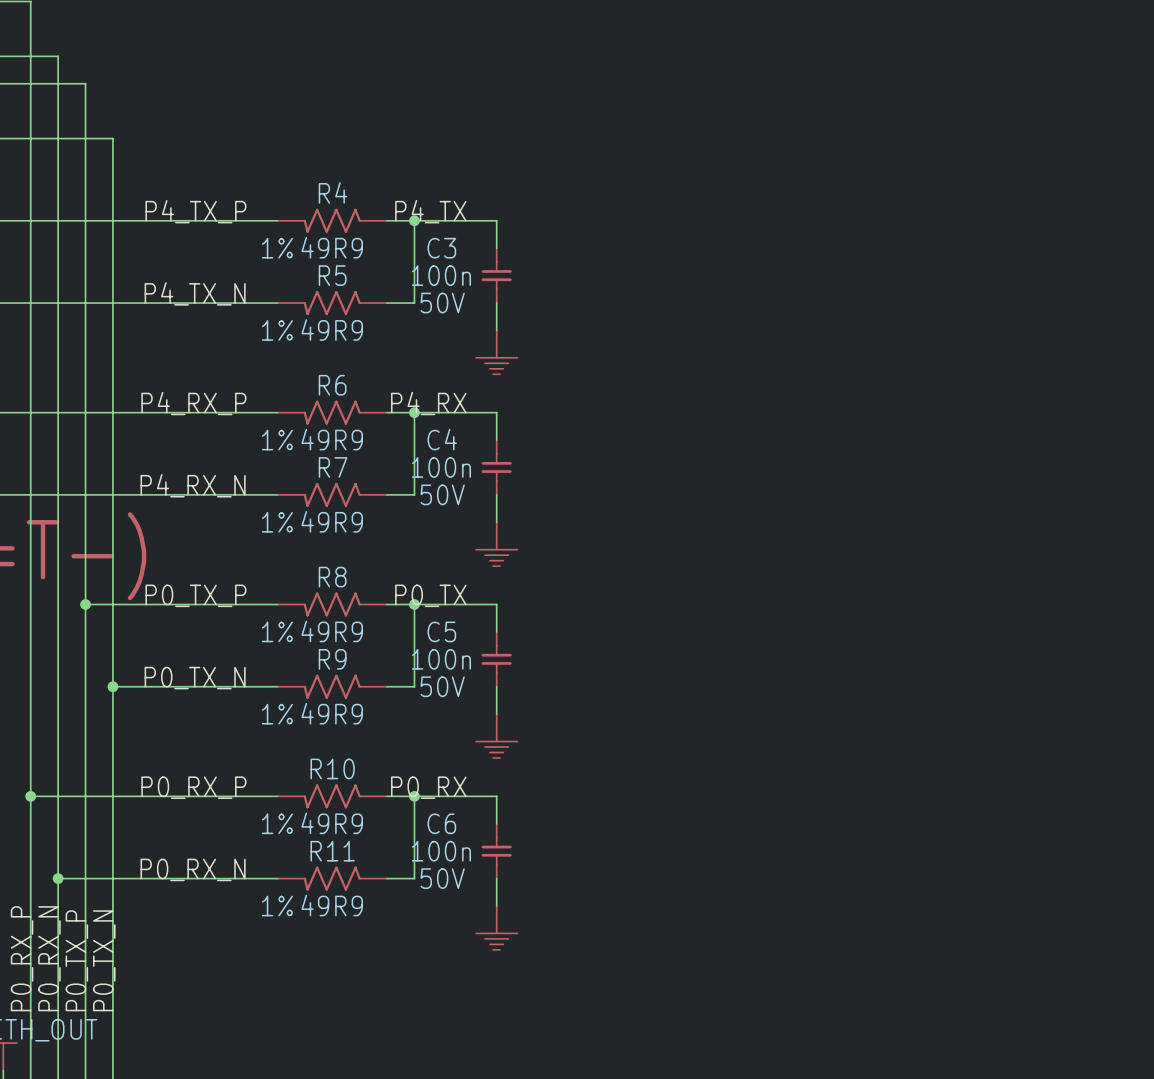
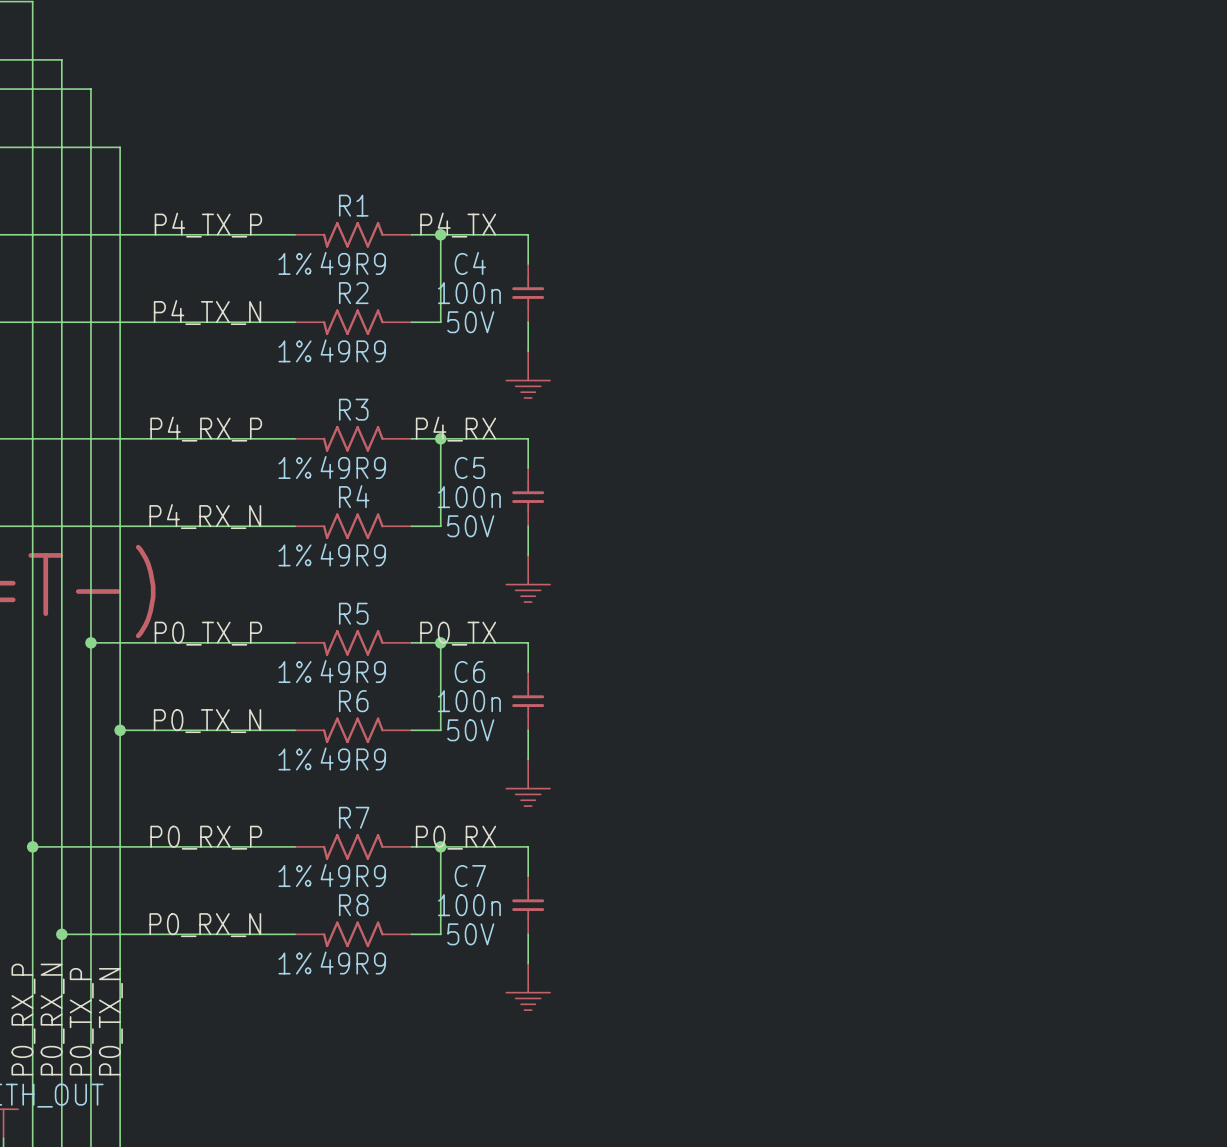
R4 name: R4 (333, 192) -> R1 (353, 205)
C3 name: C3 (441, 248) -> C4 (470, 263)
R5 name: R5 (332, 275) -> R2 (353, 293)
R6 name: R6 (332, 385) -> R3 (353, 409)
C4 name: C4 (442, 439) -> C5 (469, 467)
R7 name: R7 (333, 467) -> R4 (354, 496)
R8 name: R8 (332, 577) -> R5 (353, 613)
C5 name: C5 (441, 631) -> C6 (469, 672)
R9 name: R9 (332, 659) -> R6 (353, 701)
R10 name: R10 (332, 768) -> R7 (354, 817)
C6 name: C6 (441, 823) -> C7 (470, 876)
R11 name: R11 (332, 851) -> R8 (353, 905)

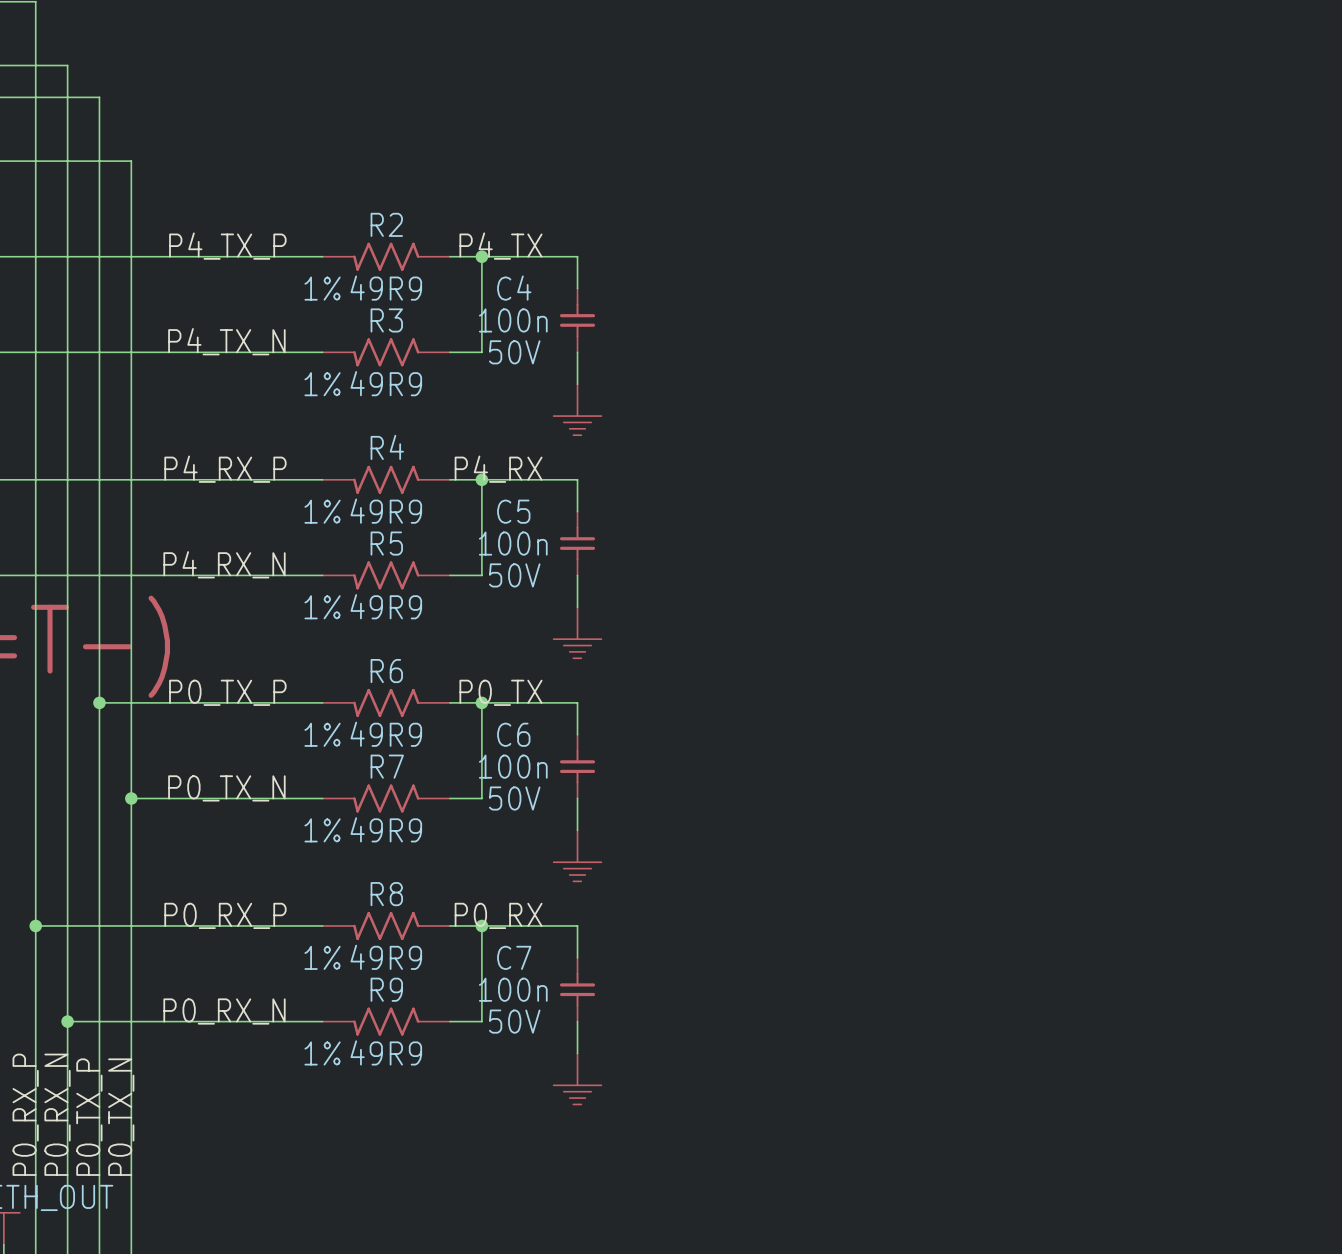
R1 name: R1 (353, 205) -> R2 (386, 224)
R2 name: R2 (353, 293) -> R3 (386, 320)
R3 name: R3 (353, 409) -> R4 (387, 447)
R4 name: R4 (354, 496) -> R5 (386, 543)
R5 name: R5 (353, 613) -> R6 (386, 671)
R6 name: R6 (353, 701) -> R7 (387, 766)
R7 name: R7 (354, 817) -> R8 (386, 894)
R8 name: R8 (353, 905) -> R9 (386, 989)

